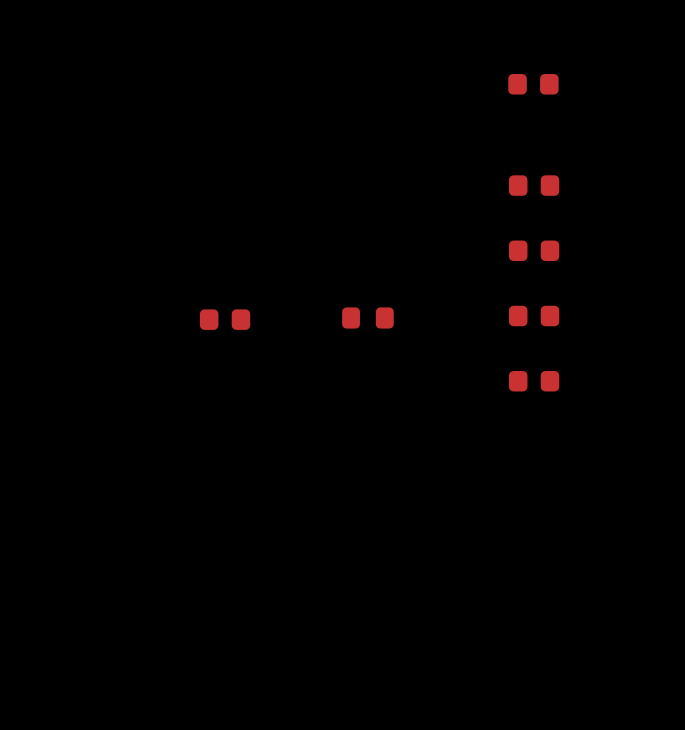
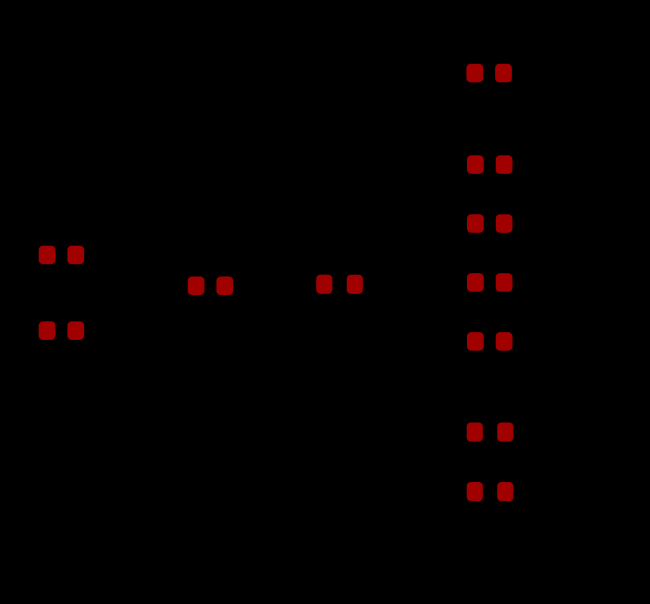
part: none -> (61, 254)
part: none -> (61, 330)
part: none -> (490, 432)
part: none -> (490, 491)

